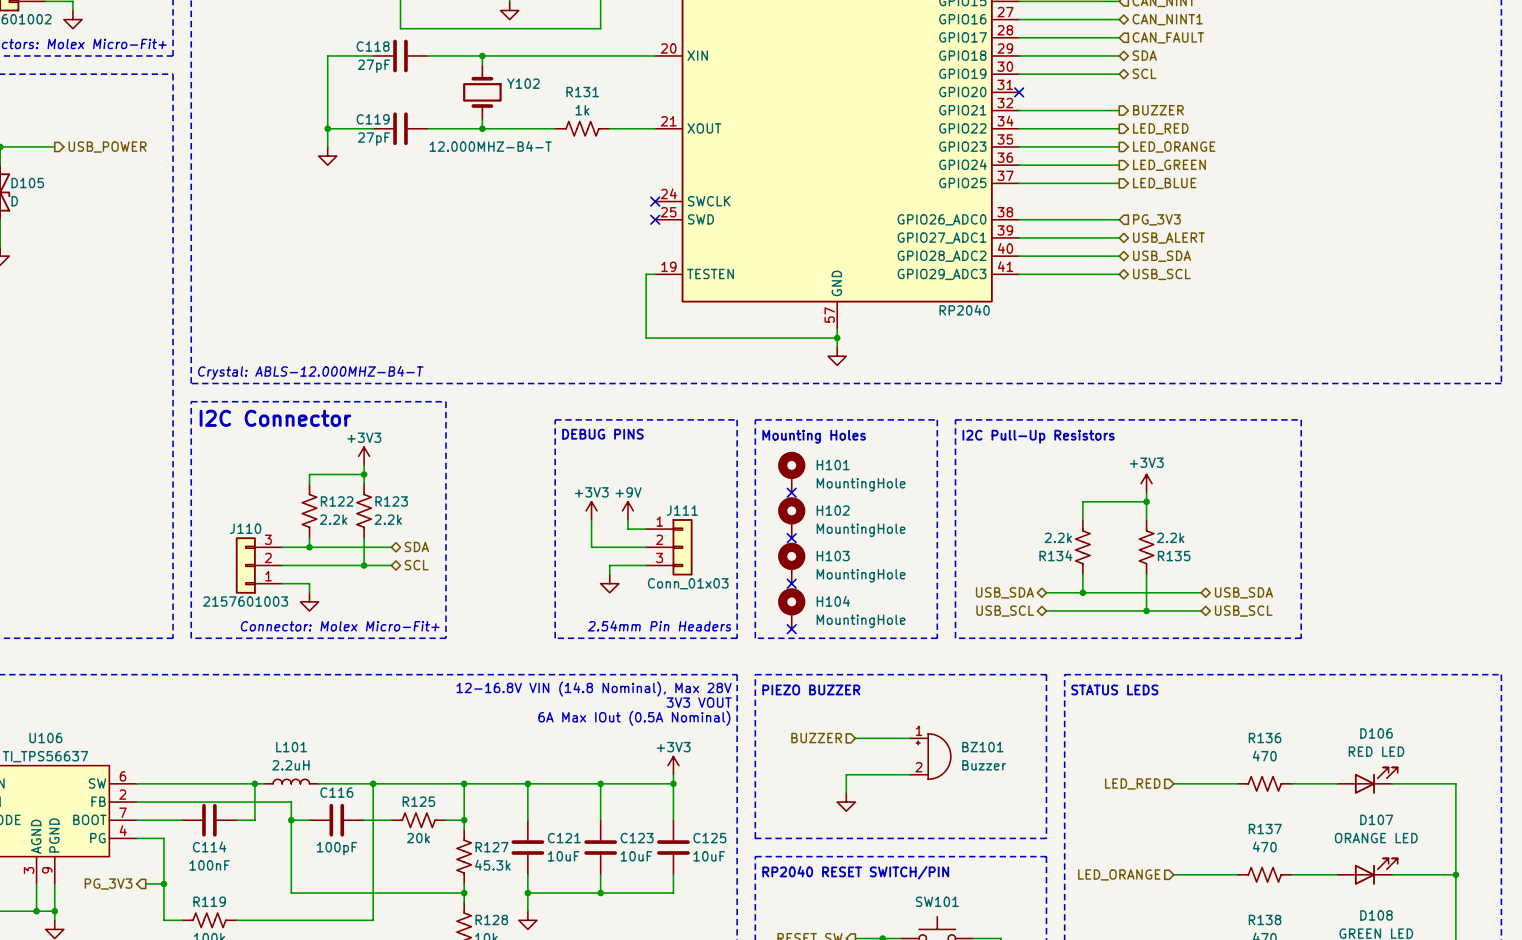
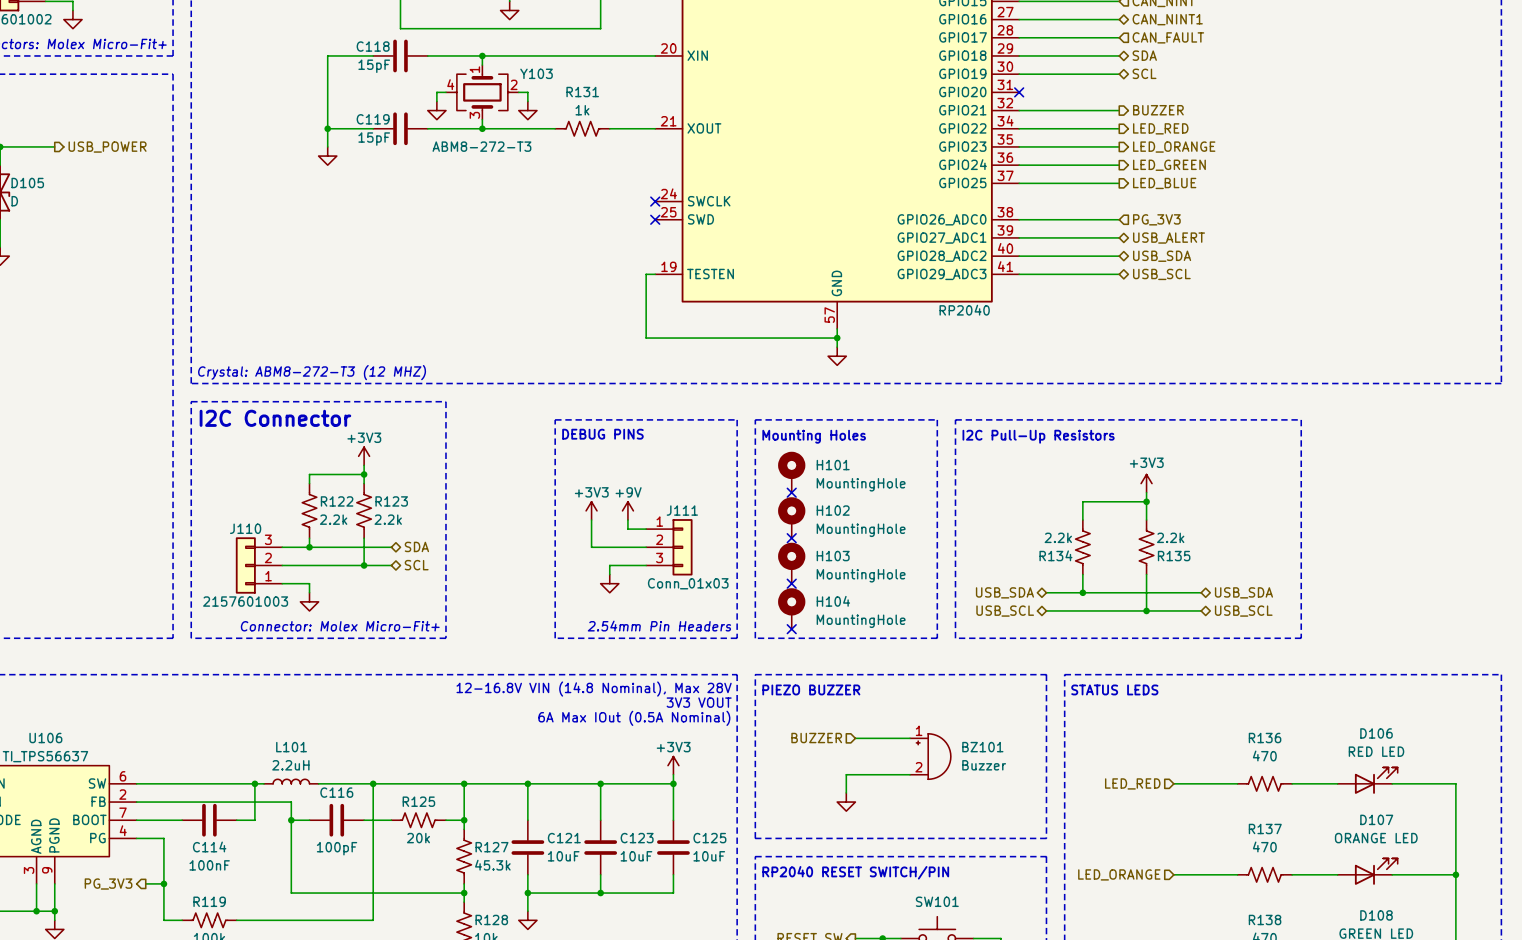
C118 value: 27pF (374, 66) -> 15pF (374, 66)
wire: none -> (445, 92) (436, 92) (436, 101)
Y102: 12.000MHZ-B4-T (482, 92) -> none
Y103: none -> ABM8-272-T3 (482, 92)
wire: none -> (518, 92) (527, 92) (527, 101)
power symbol: none -> (436, 110)
power symbol: none -> (527, 110)
C119 value: 27pF (374, 139) -> 15pF (374, 139)
text: Crystal: ABLS-12.000MHZ-B4-T (310, 372) -> Crystal: ABM8-272-T3 (12 MHZ) (312, 372)

